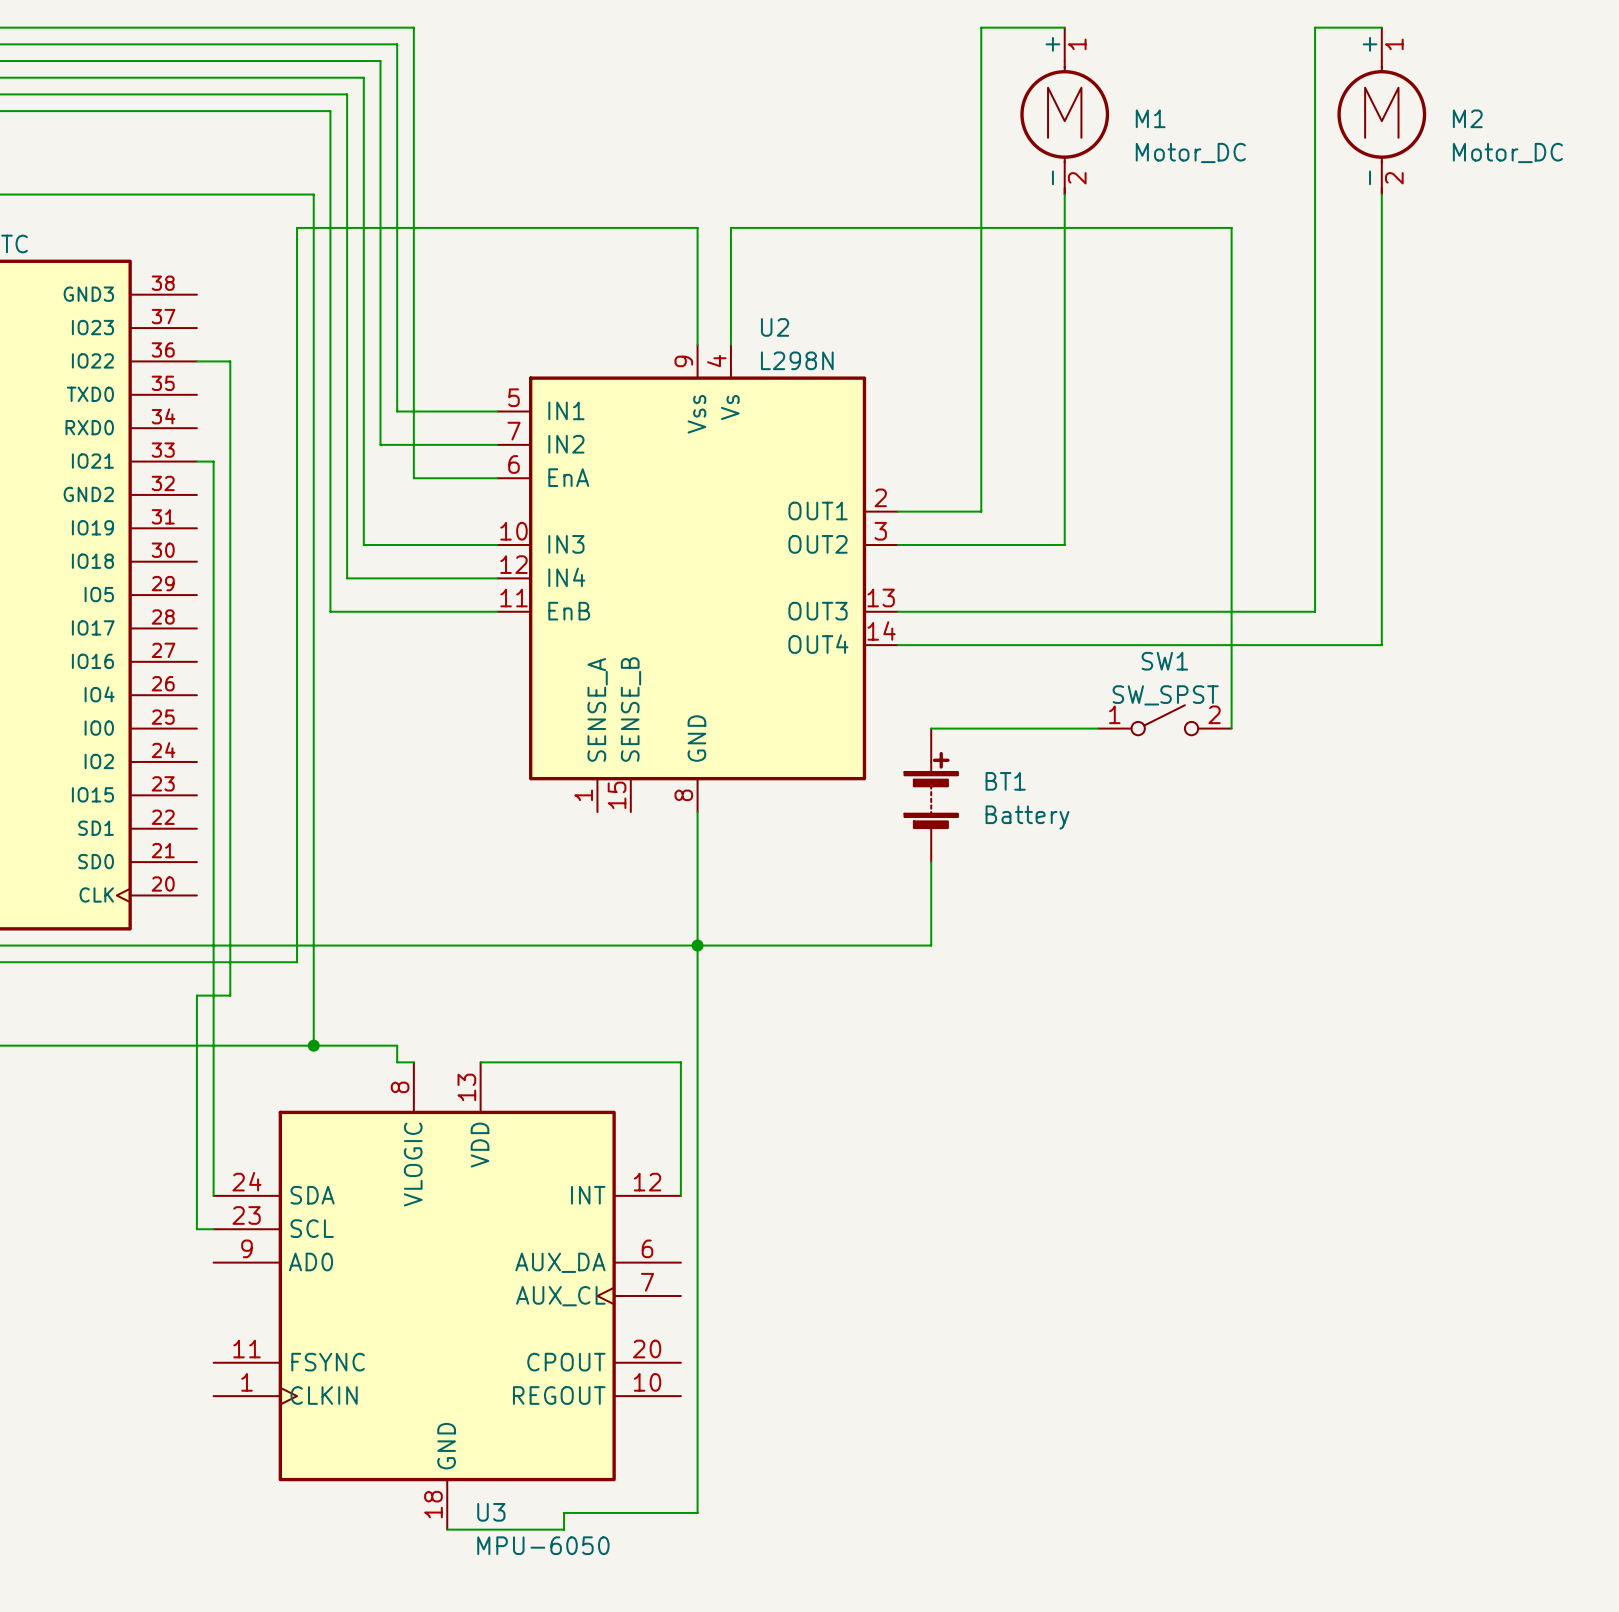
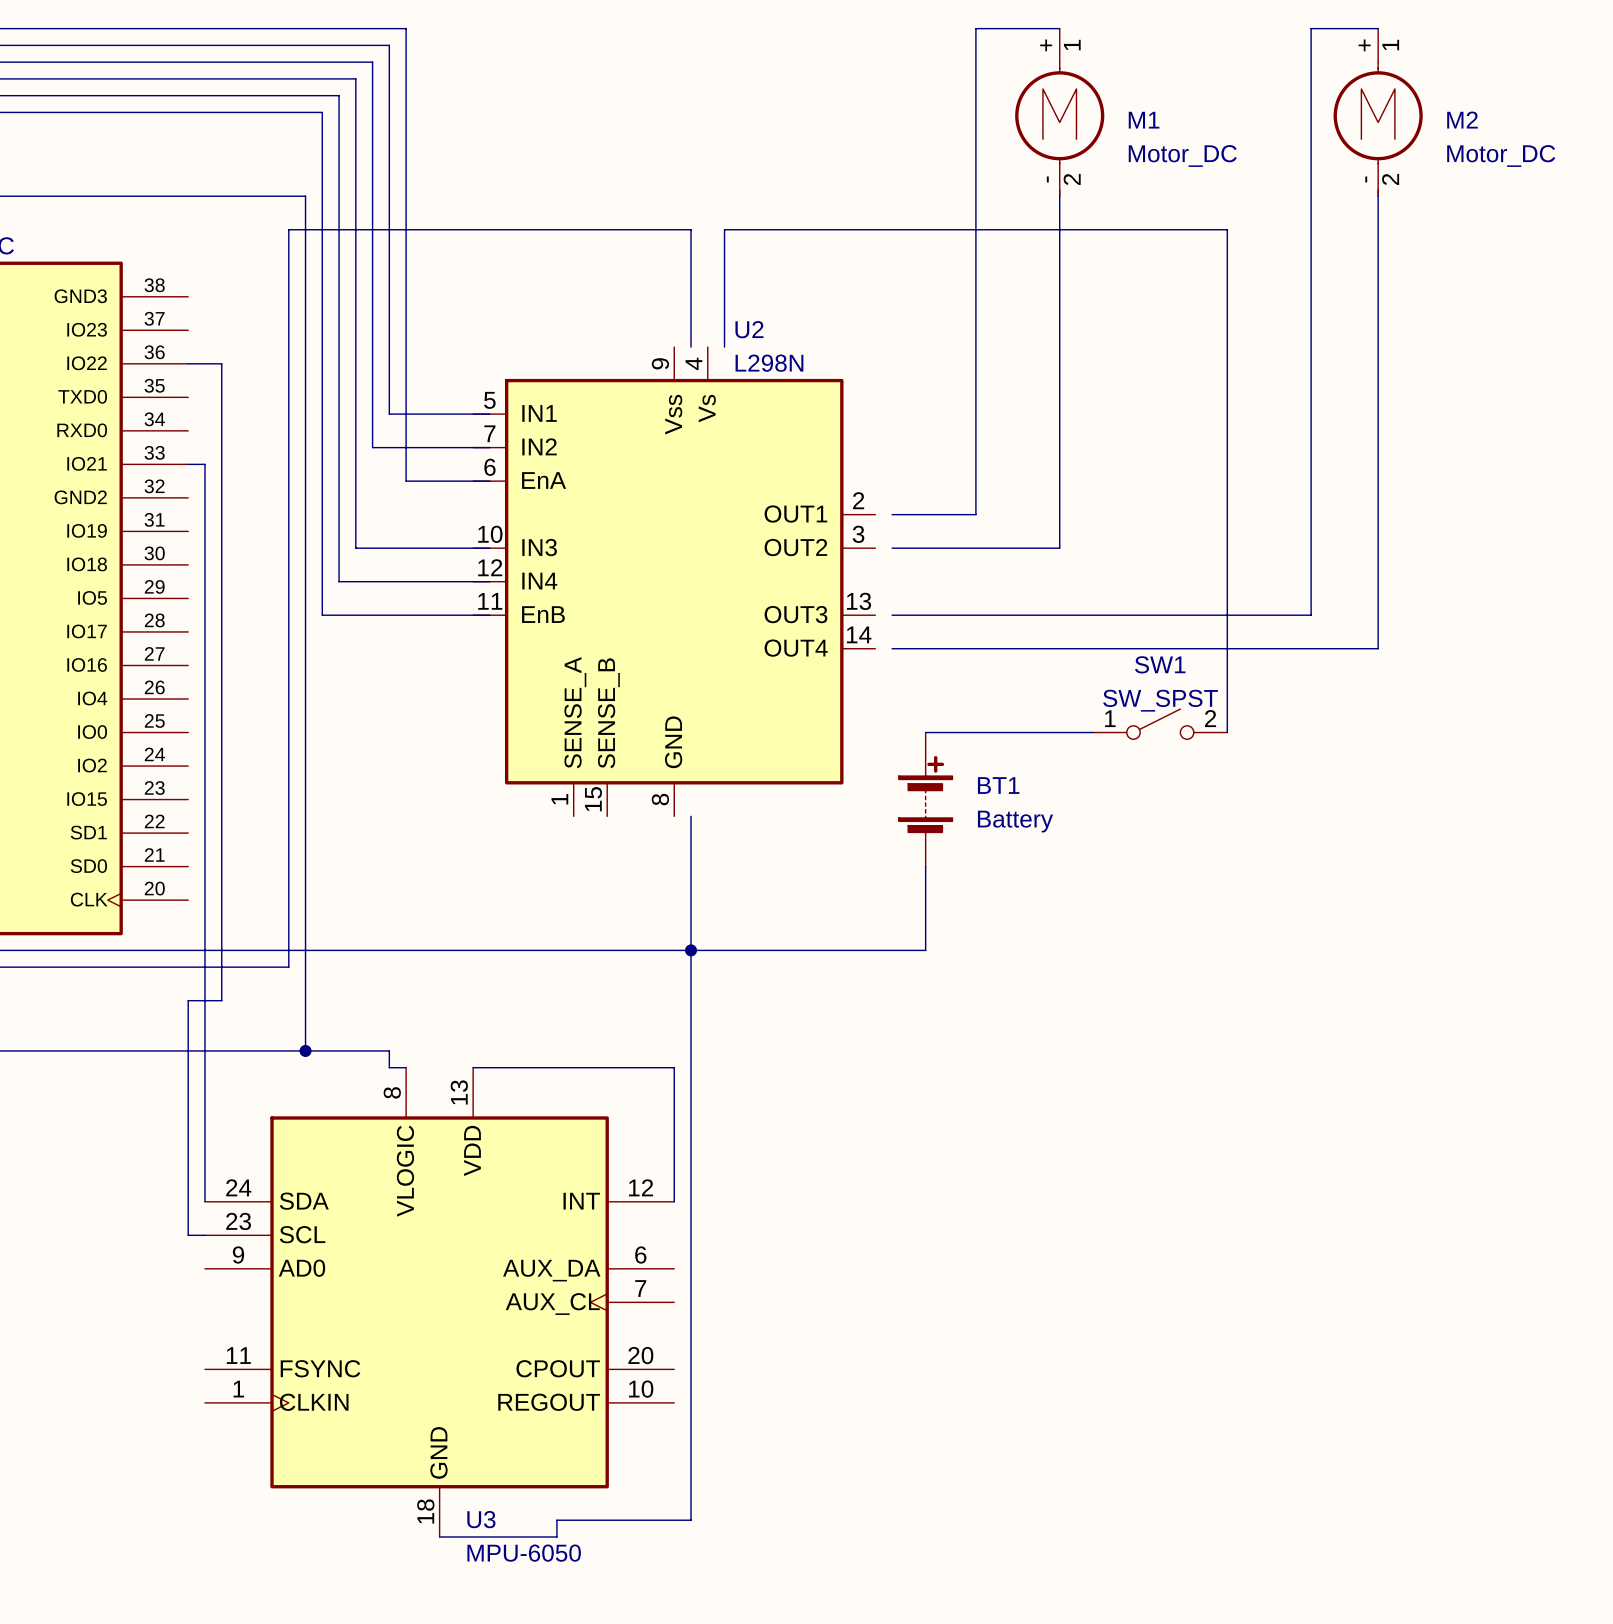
U2 position: (697, 578) -> (674, 581)

